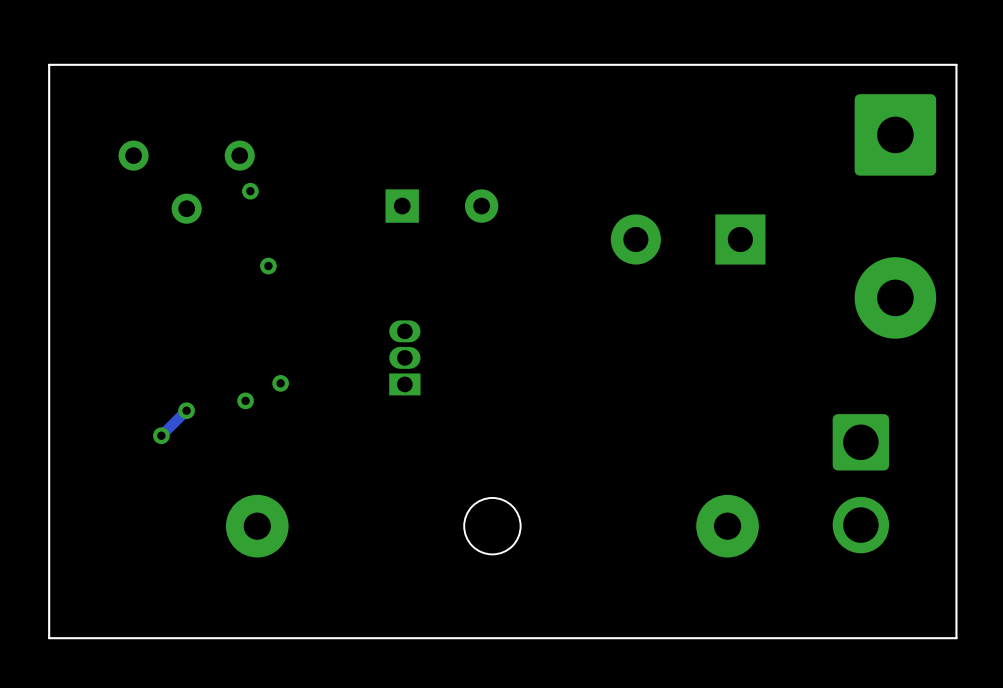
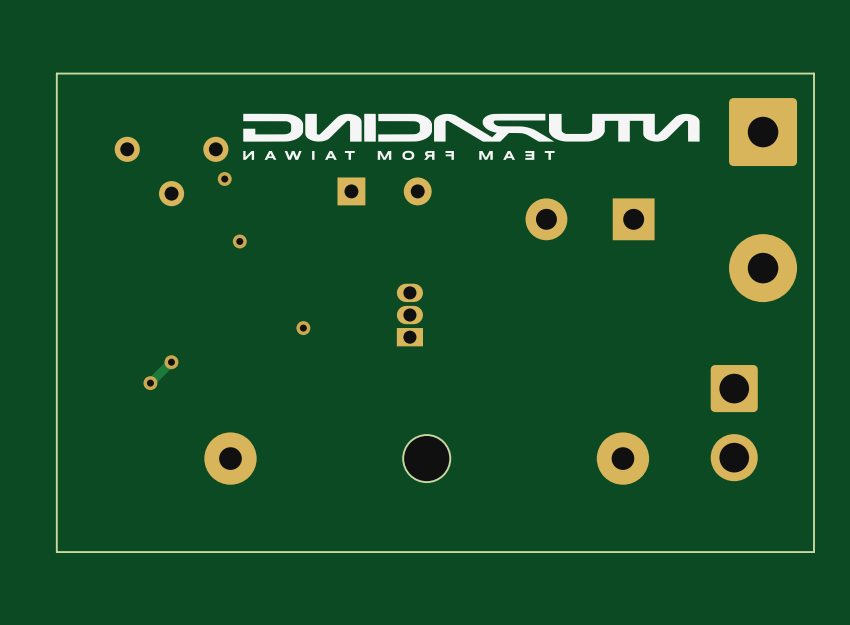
drawing: none -> [243, 113, 700, 161]
part position: (404, 357) -> (409, 315)
via: none -> (303, 328)
via: (280, 383) -> none
via: (245, 400) -> none

